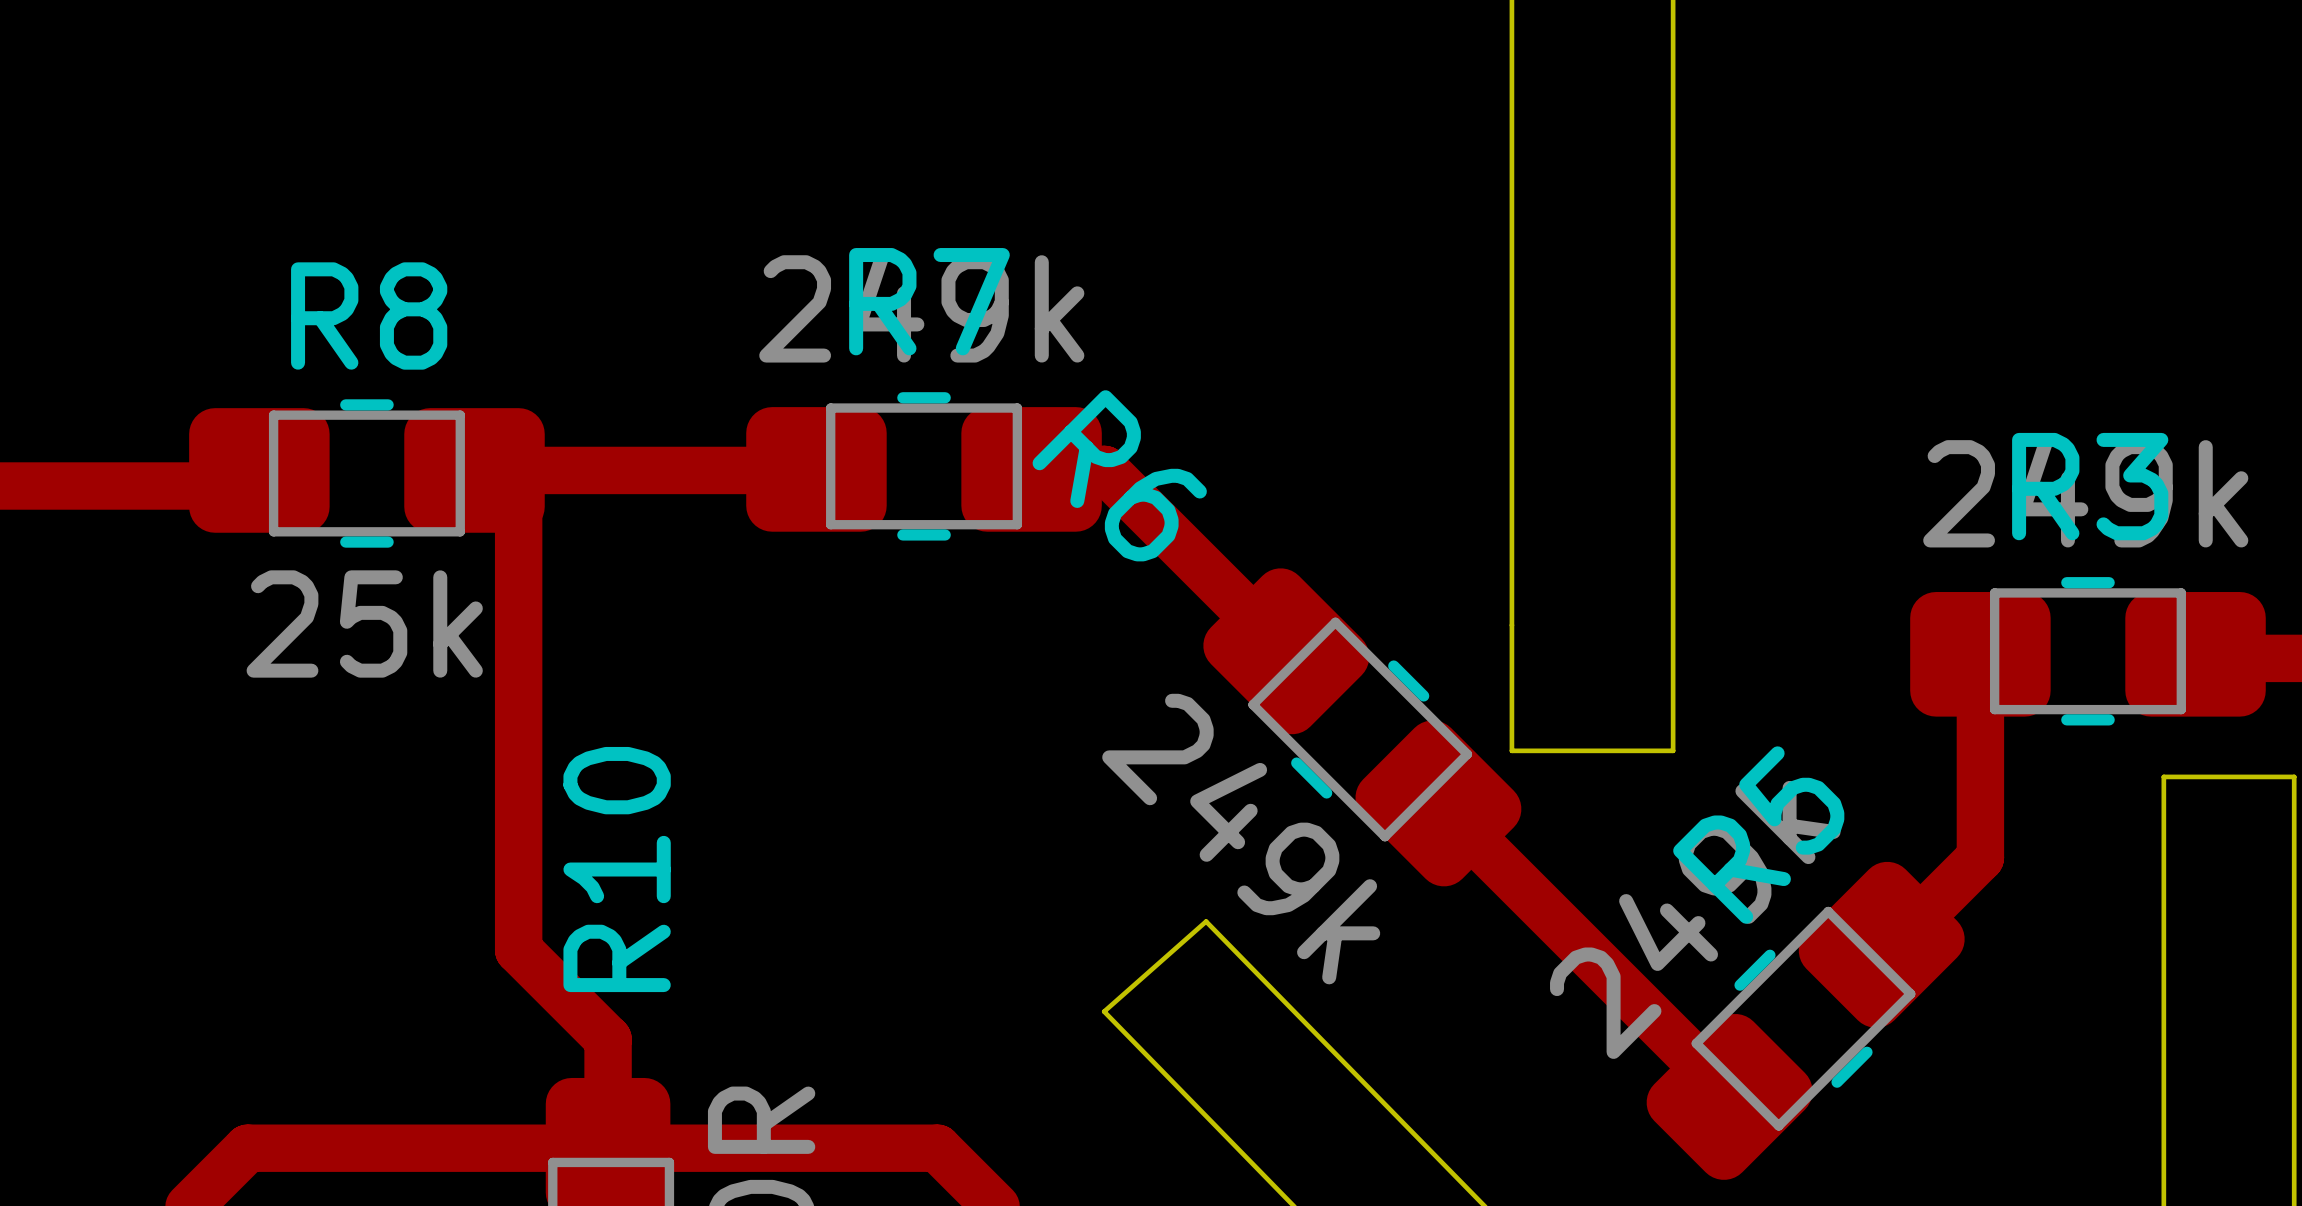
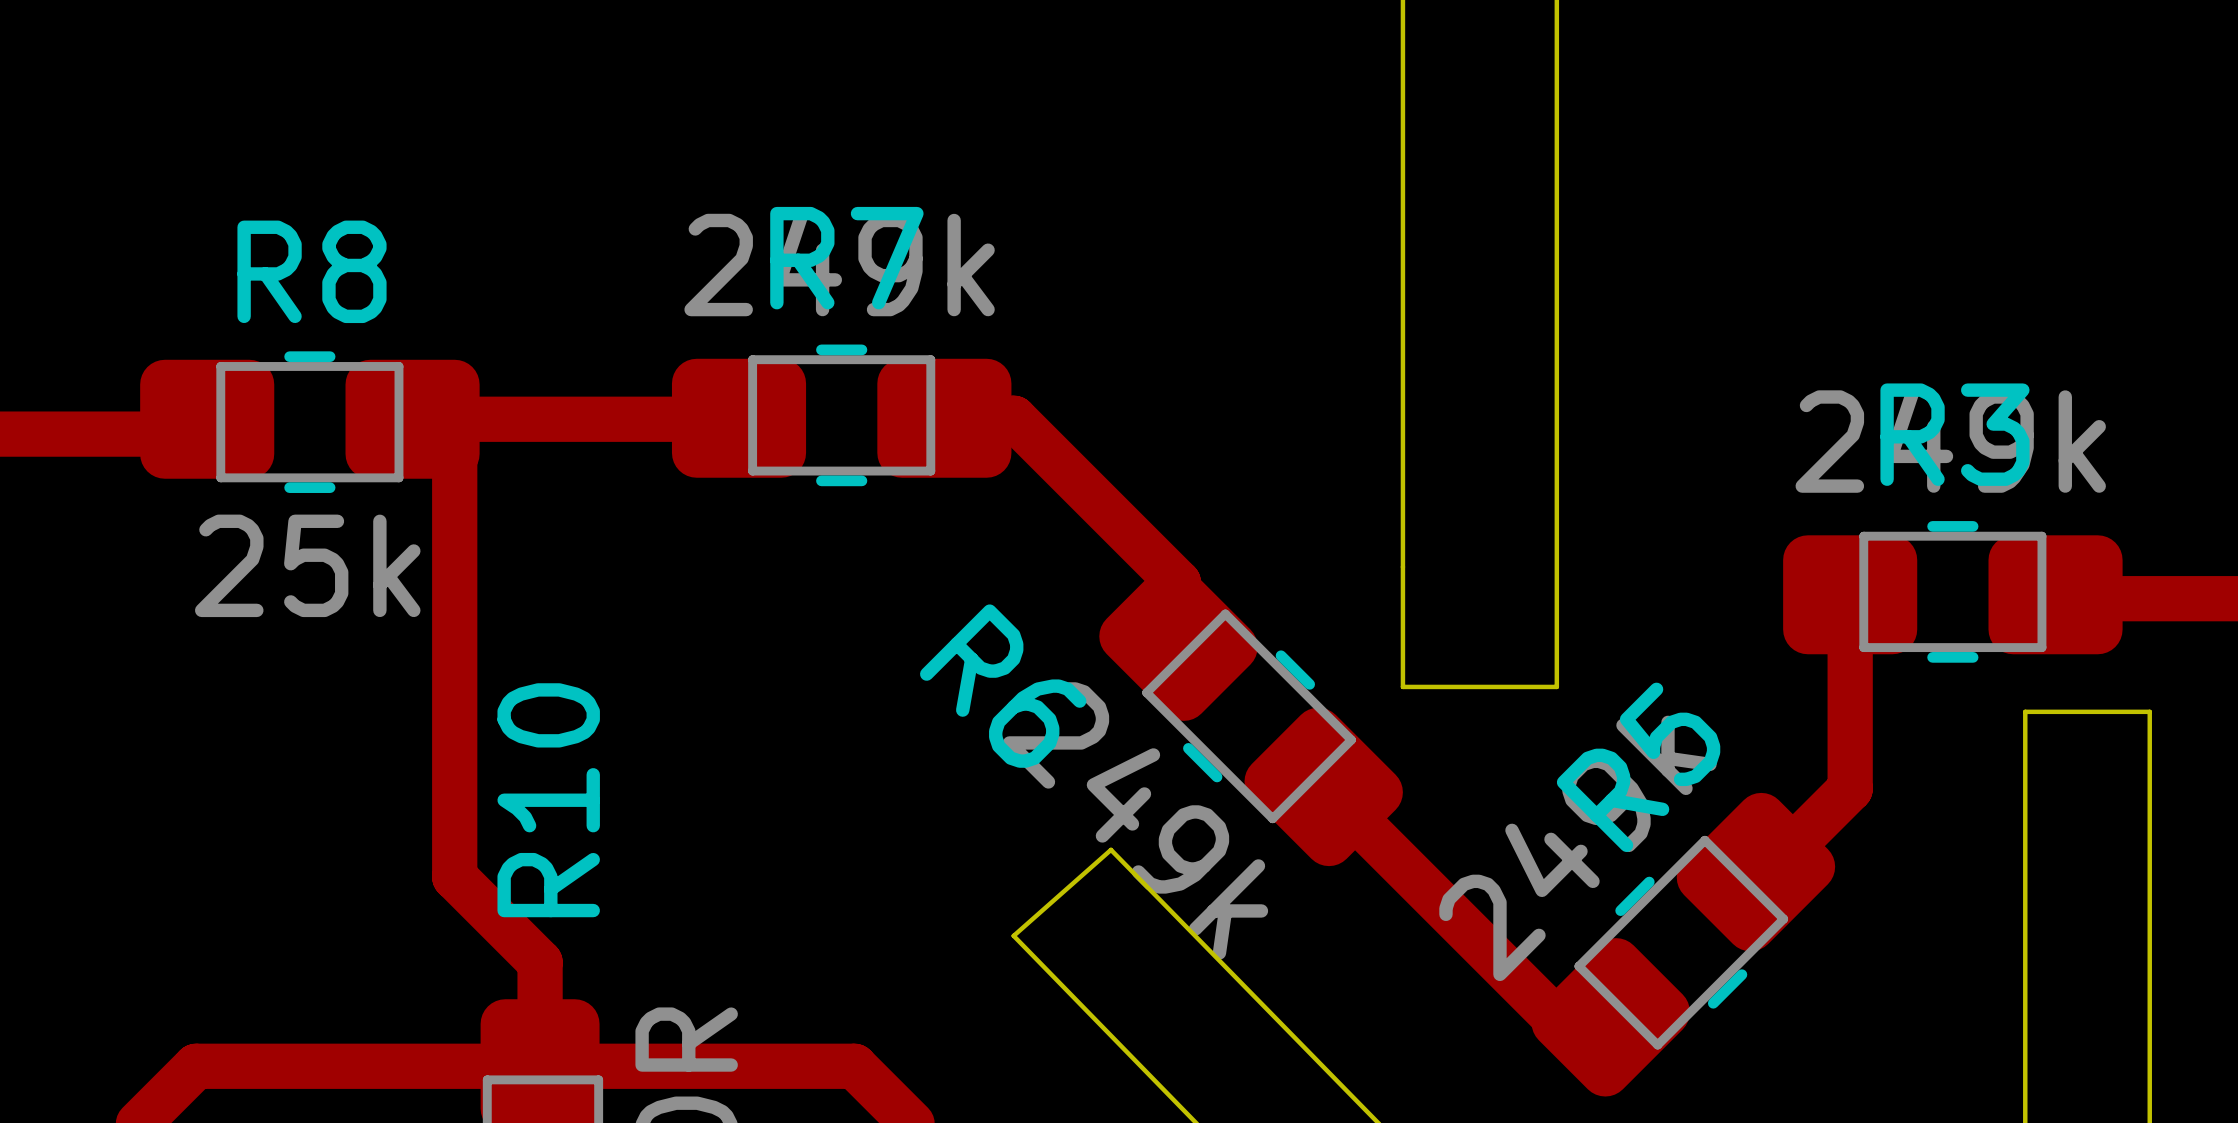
R6 name position: R6 (1119, 475) -> R6 (1003, 686)
R6 position: (1362, 727) -> (1251, 714)
track: (1438, 803) (1729, 1094) (1729, 1096) -> (1332, 795) (1554, 1017) (1610, 1017)

